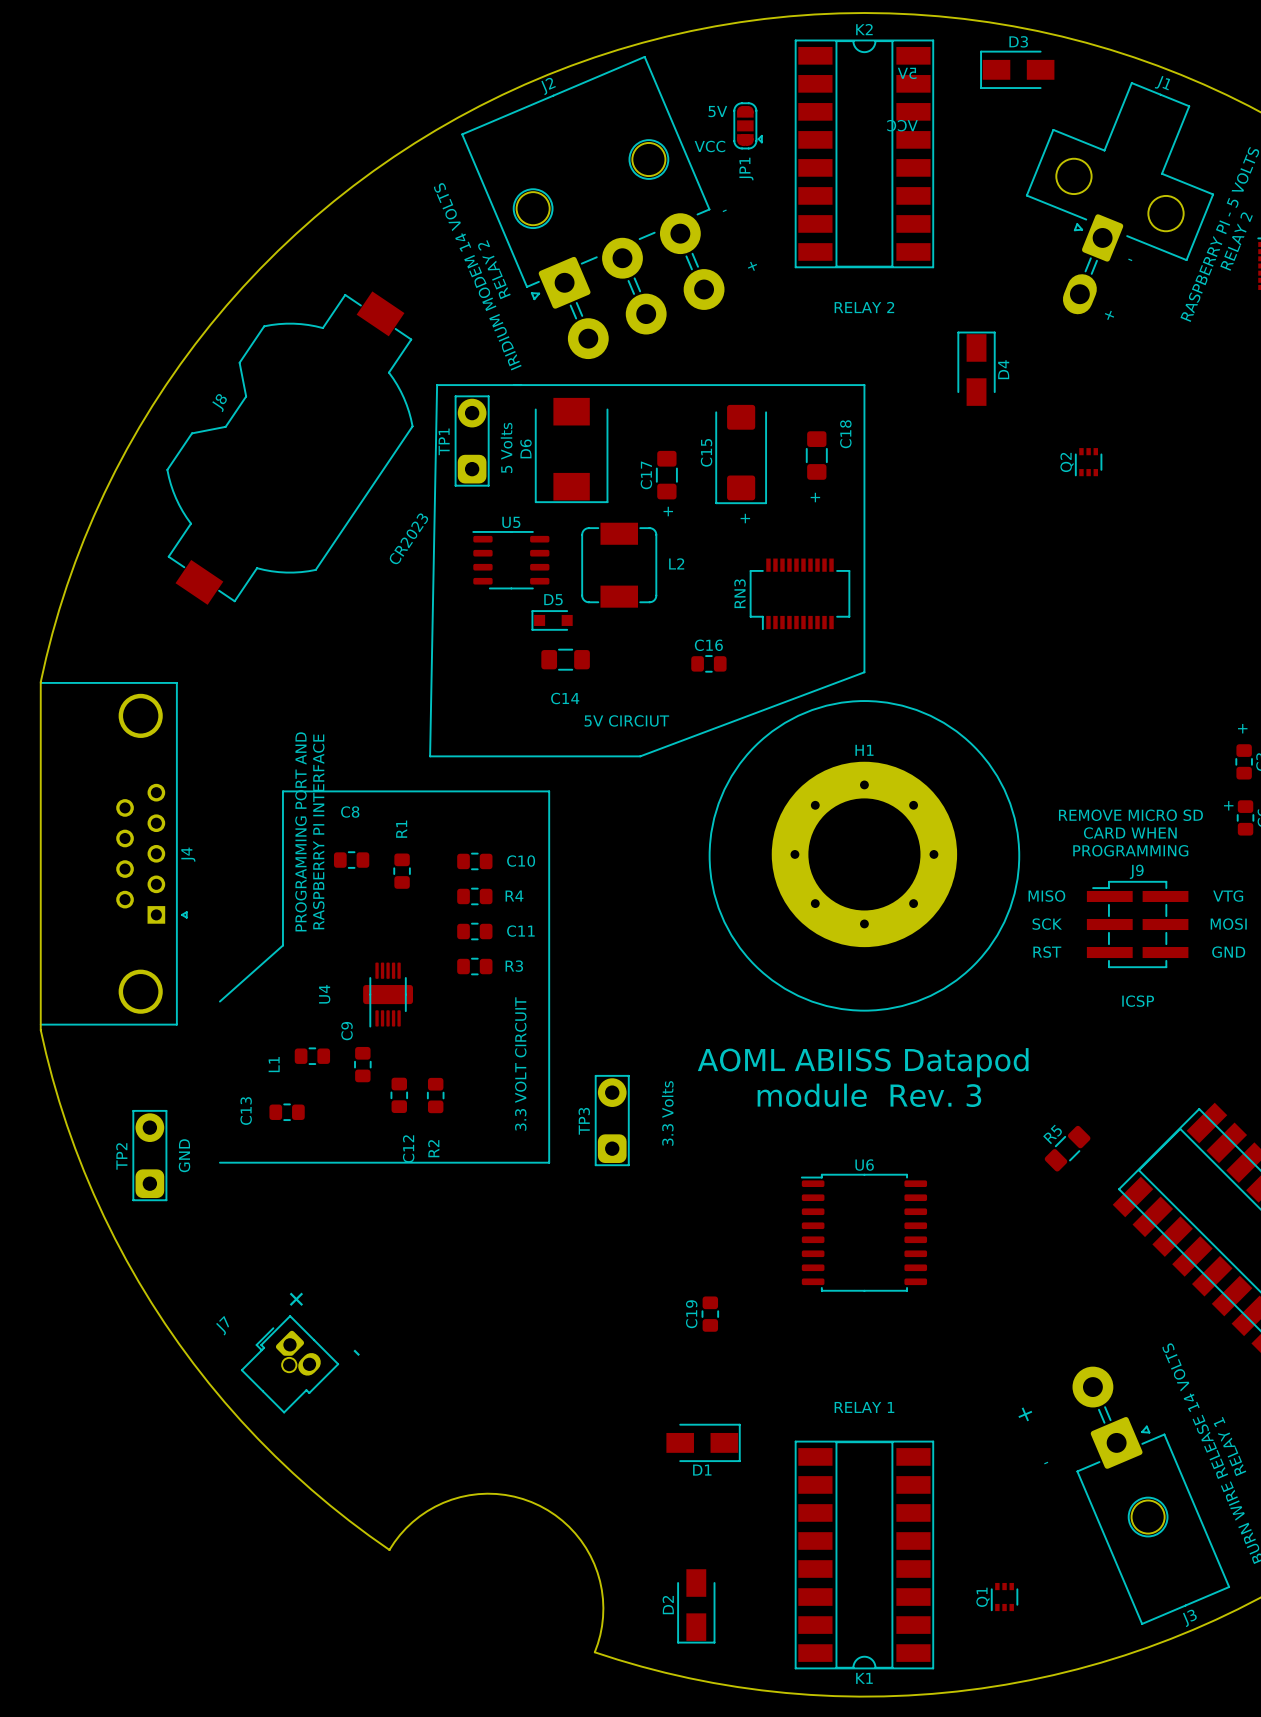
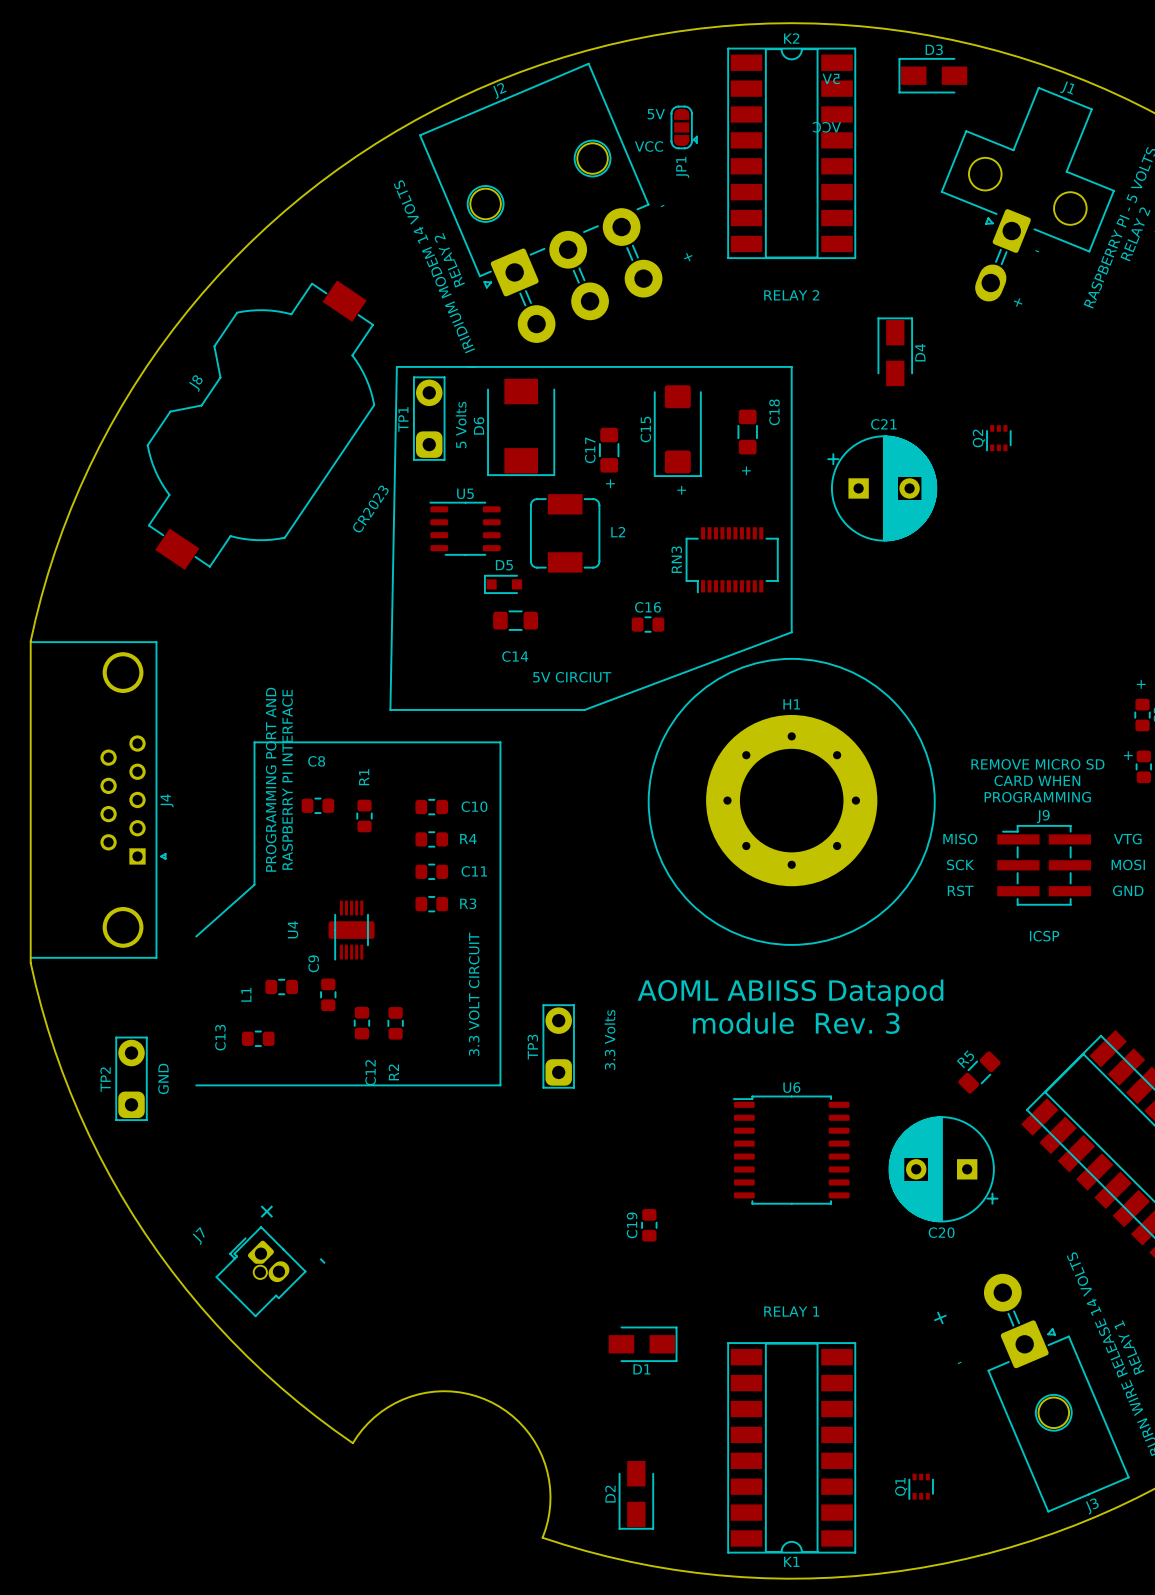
C21: none -> (882, 488)
C20: none -> (943, 1169)

